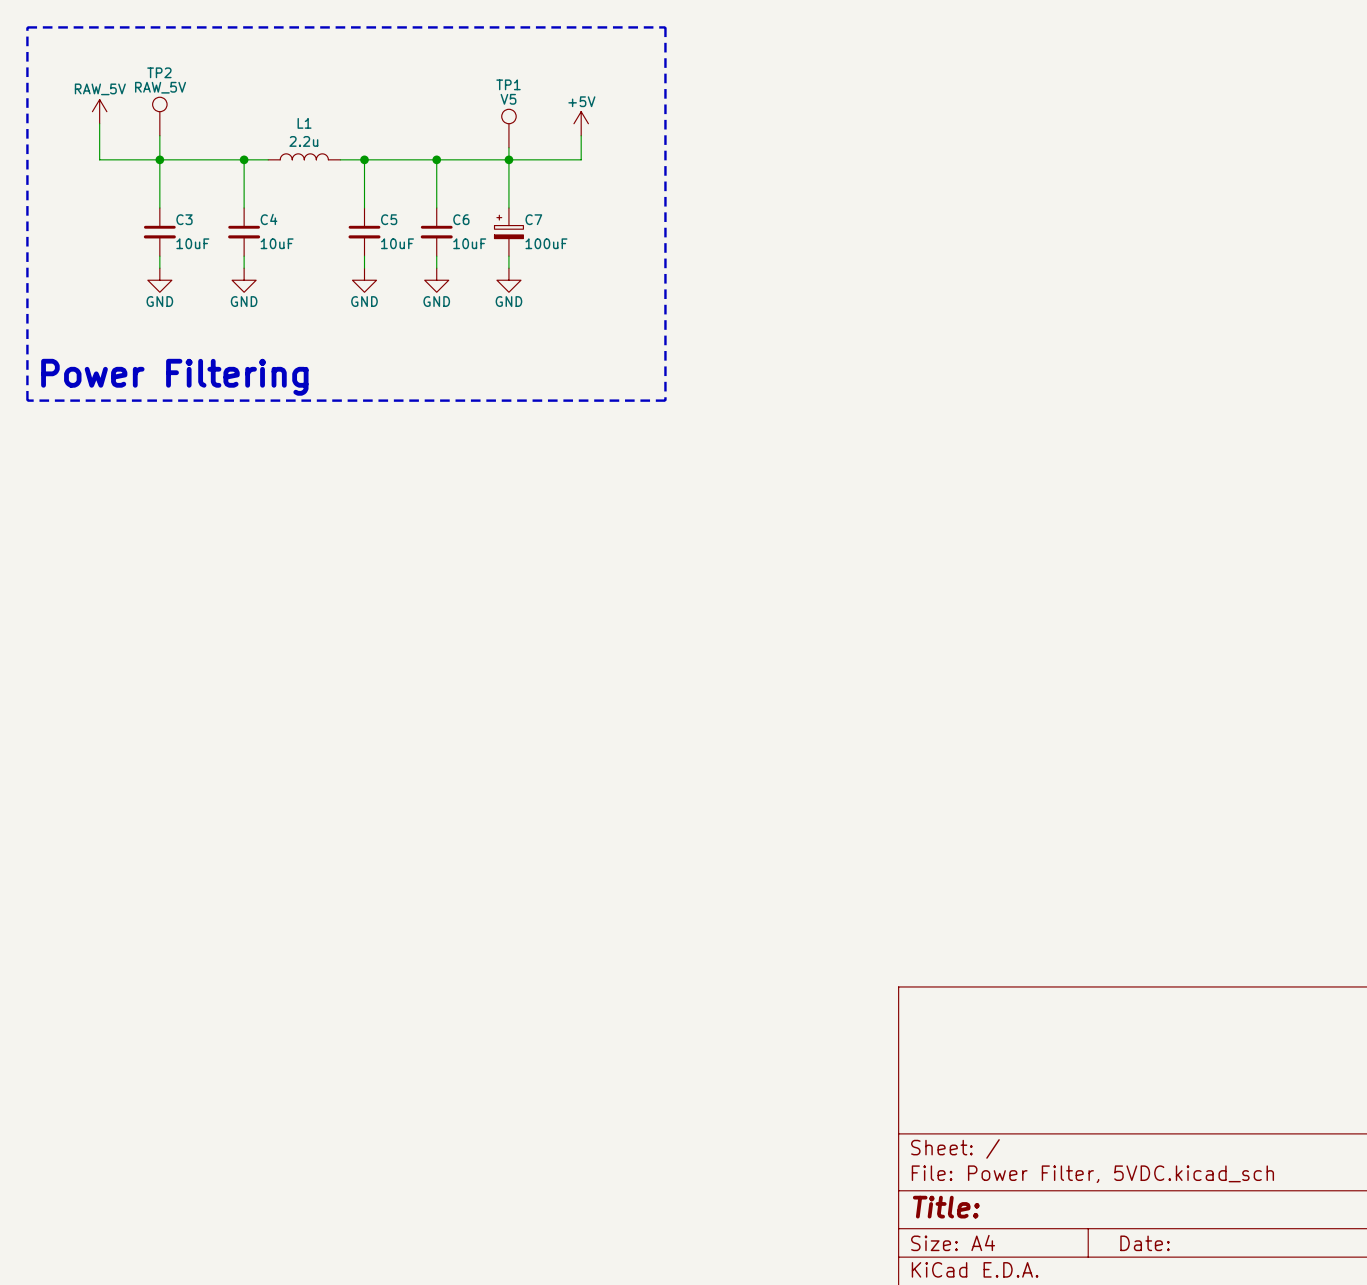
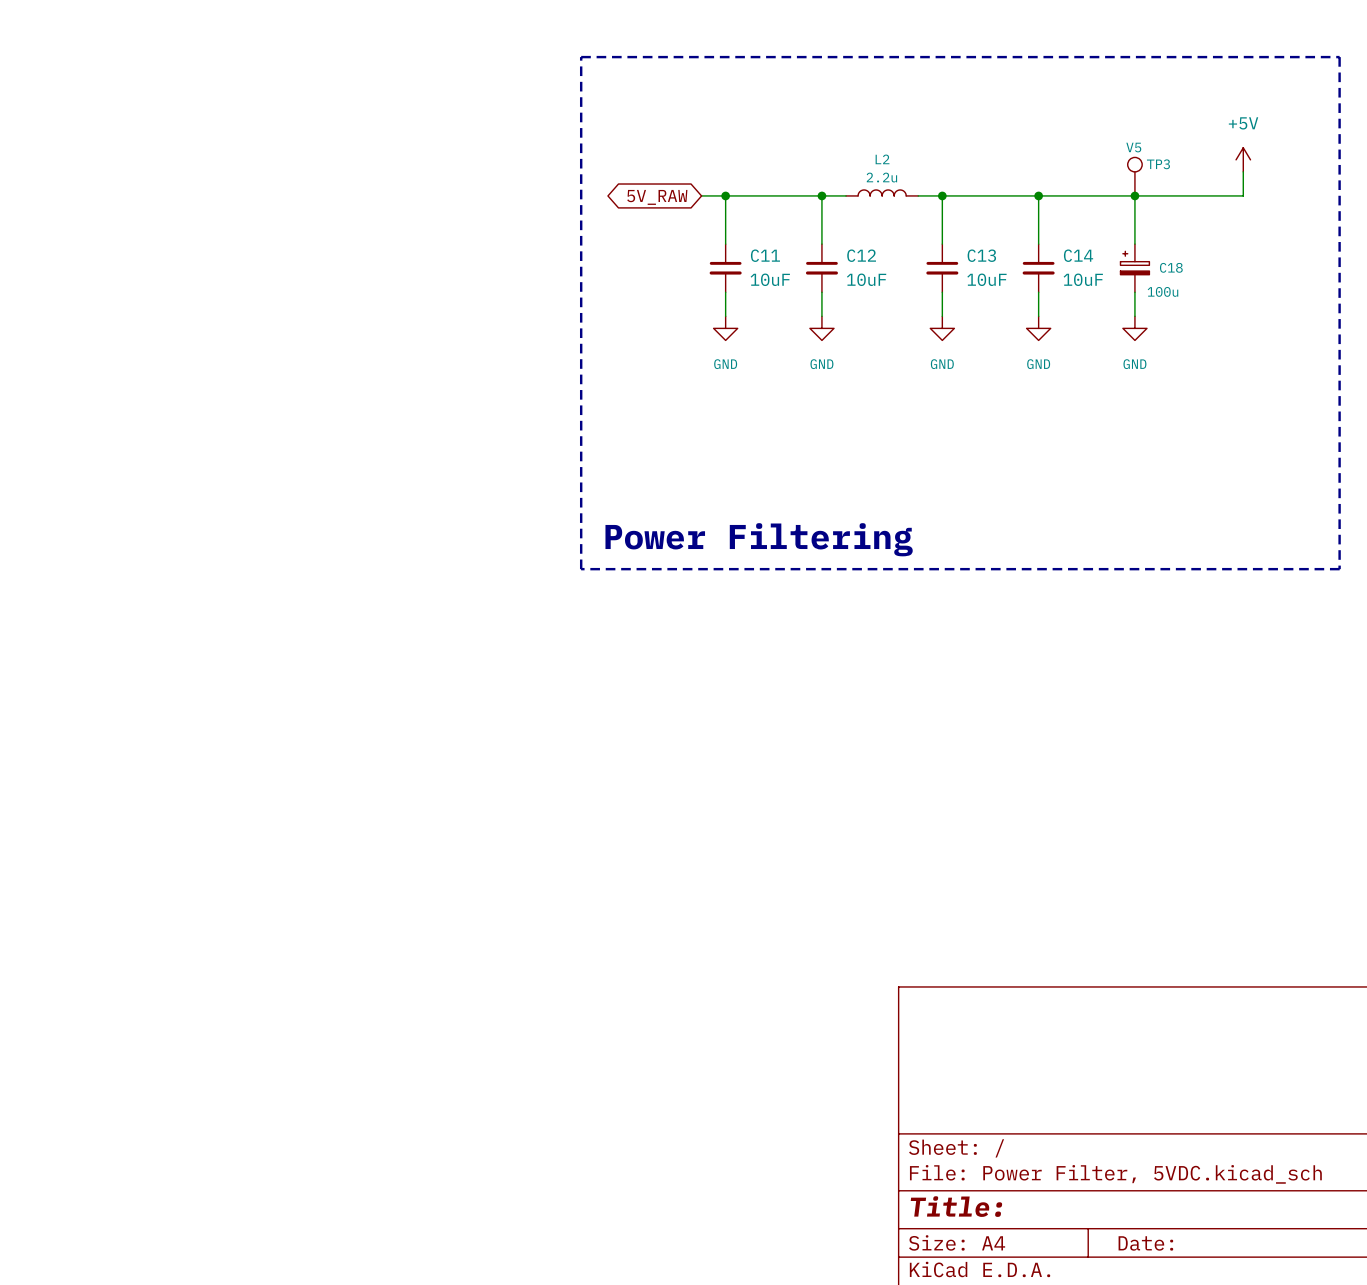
line: (27, 27) (665, 27) (665, 400) (27, 400) (27, 27) -> none
line: none -> (581, 57) (1339, 57) (1339, 569) (581, 569) (581, 57)
power symbol: RAW_5V (99, 111) -> none
TP2: RAW_5V (159, 116) -> none
wire: (99, 123) (99, 159) (268, 159) -> none
power symbol: +5V (581, 123) -> none
TP1: V5 (508, 128) -> none
wire: (159, 135) (159, 208) -> none
wire: (581, 135) (581, 159) (340, 159) -> none
wire: (508, 147) (508, 208) -> none
L1: 2.2u (304, 156) -> none
junction: (159, 159) -> none
wire: (244, 159) (244, 208) -> none
junction: (244, 159) -> none
wire: (364, 159) (364, 208) -> none
junction: (364, 159) -> none
wire: (436, 159) (436, 208) -> none
junction: (436, 159) -> none
junction: (508, 159) -> none
power symbol: none -> +5V (1243, 159)
wire: none -> (1243, 171) (1243, 195) (918, 195)
TP3: none -> V5 (1134, 176)
L2: none -> 2.2u (882, 192)
wire: none -> (701, 195) (846, 195)
wire: none -> (725, 195) (725, 244)
junction: none -> (725, 195)
wire: none -> (821, 195) (821, 244)
junction: none -> (821, 195)
wire: none -> (942, 195) (942, 244)
junction: none -> (942, 195)
wire: none -> (1038, 195) (1038, 244)
junction: none -> (1038, 195)
wire: none -> (1134, 195) (1134, 244)
junction: none -> (1134, 195)
global label: none -> 5V_RAW (657, 197)
C3: 10uF (159, 232) -> none
C4: 10uF (244, 232) -> none
C5: 10uF (364, 232) -> none
C6: 10uF (436, 232) -> none
C7: 100uF (508, 232) -> none
wire: (159, 256) (159, 268) -> none
wire: (244, 256) (244, 268) -> none
wire: (364, 256) (364, 268) -> none
wire: (436, 256) (436, 268) -> none
wire: (508, 256) (508, 268) -> none
C11: none -> 10uF (725, 268)
C12: none -> 10uF (821, 268)
C13: none -> 10uF (942, 268)
C14: none -> 10uF (1038, 268)
C18: none -> 100u (1134, 268)
power symbol: GND (159, 280) -> none
power symbol: GND (244, 280) -> none
power symbol: GND (364, 280) -> none
power symbol: GND (436, 280) -> none
power symbol: GND (508, 280) -> none
wire: none -> (725, 292) (725, 316)
wire: none -> (821, 292) (821, 316)
wire: none -> (942, 292) (942, 316)
wire: none -> (1038, 292) (1038, 316)
wire: none -> (1134, 292) (1134, 316)
power symbol: none -> GND (725, 328)
power symbol: none -> GND (821, 328)
power symbol: none -> GND (942, 328)
power symbol: none -> GND (1038, 328)
power symbol: none -> GND (1134, 328)
text: Power Filtering (174, 377) -> none
text: none -> Power Filtering (759, 539)

